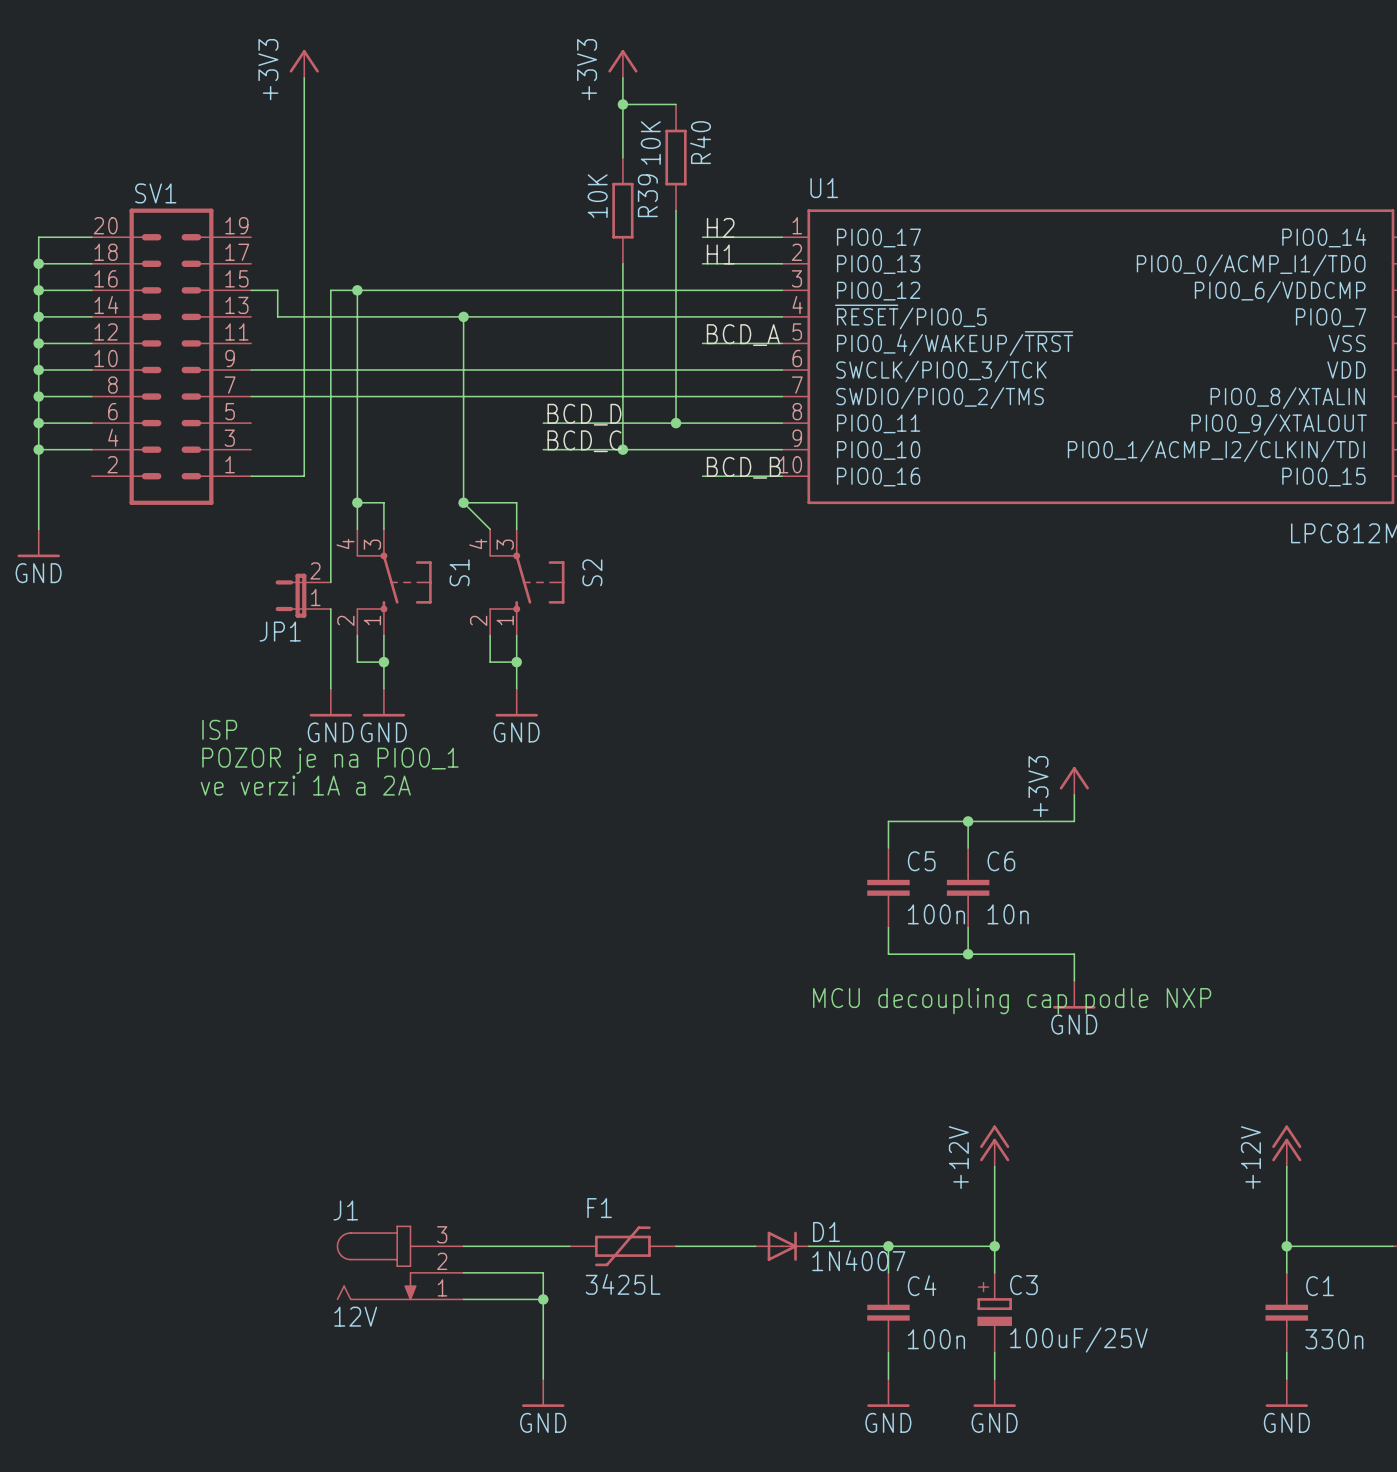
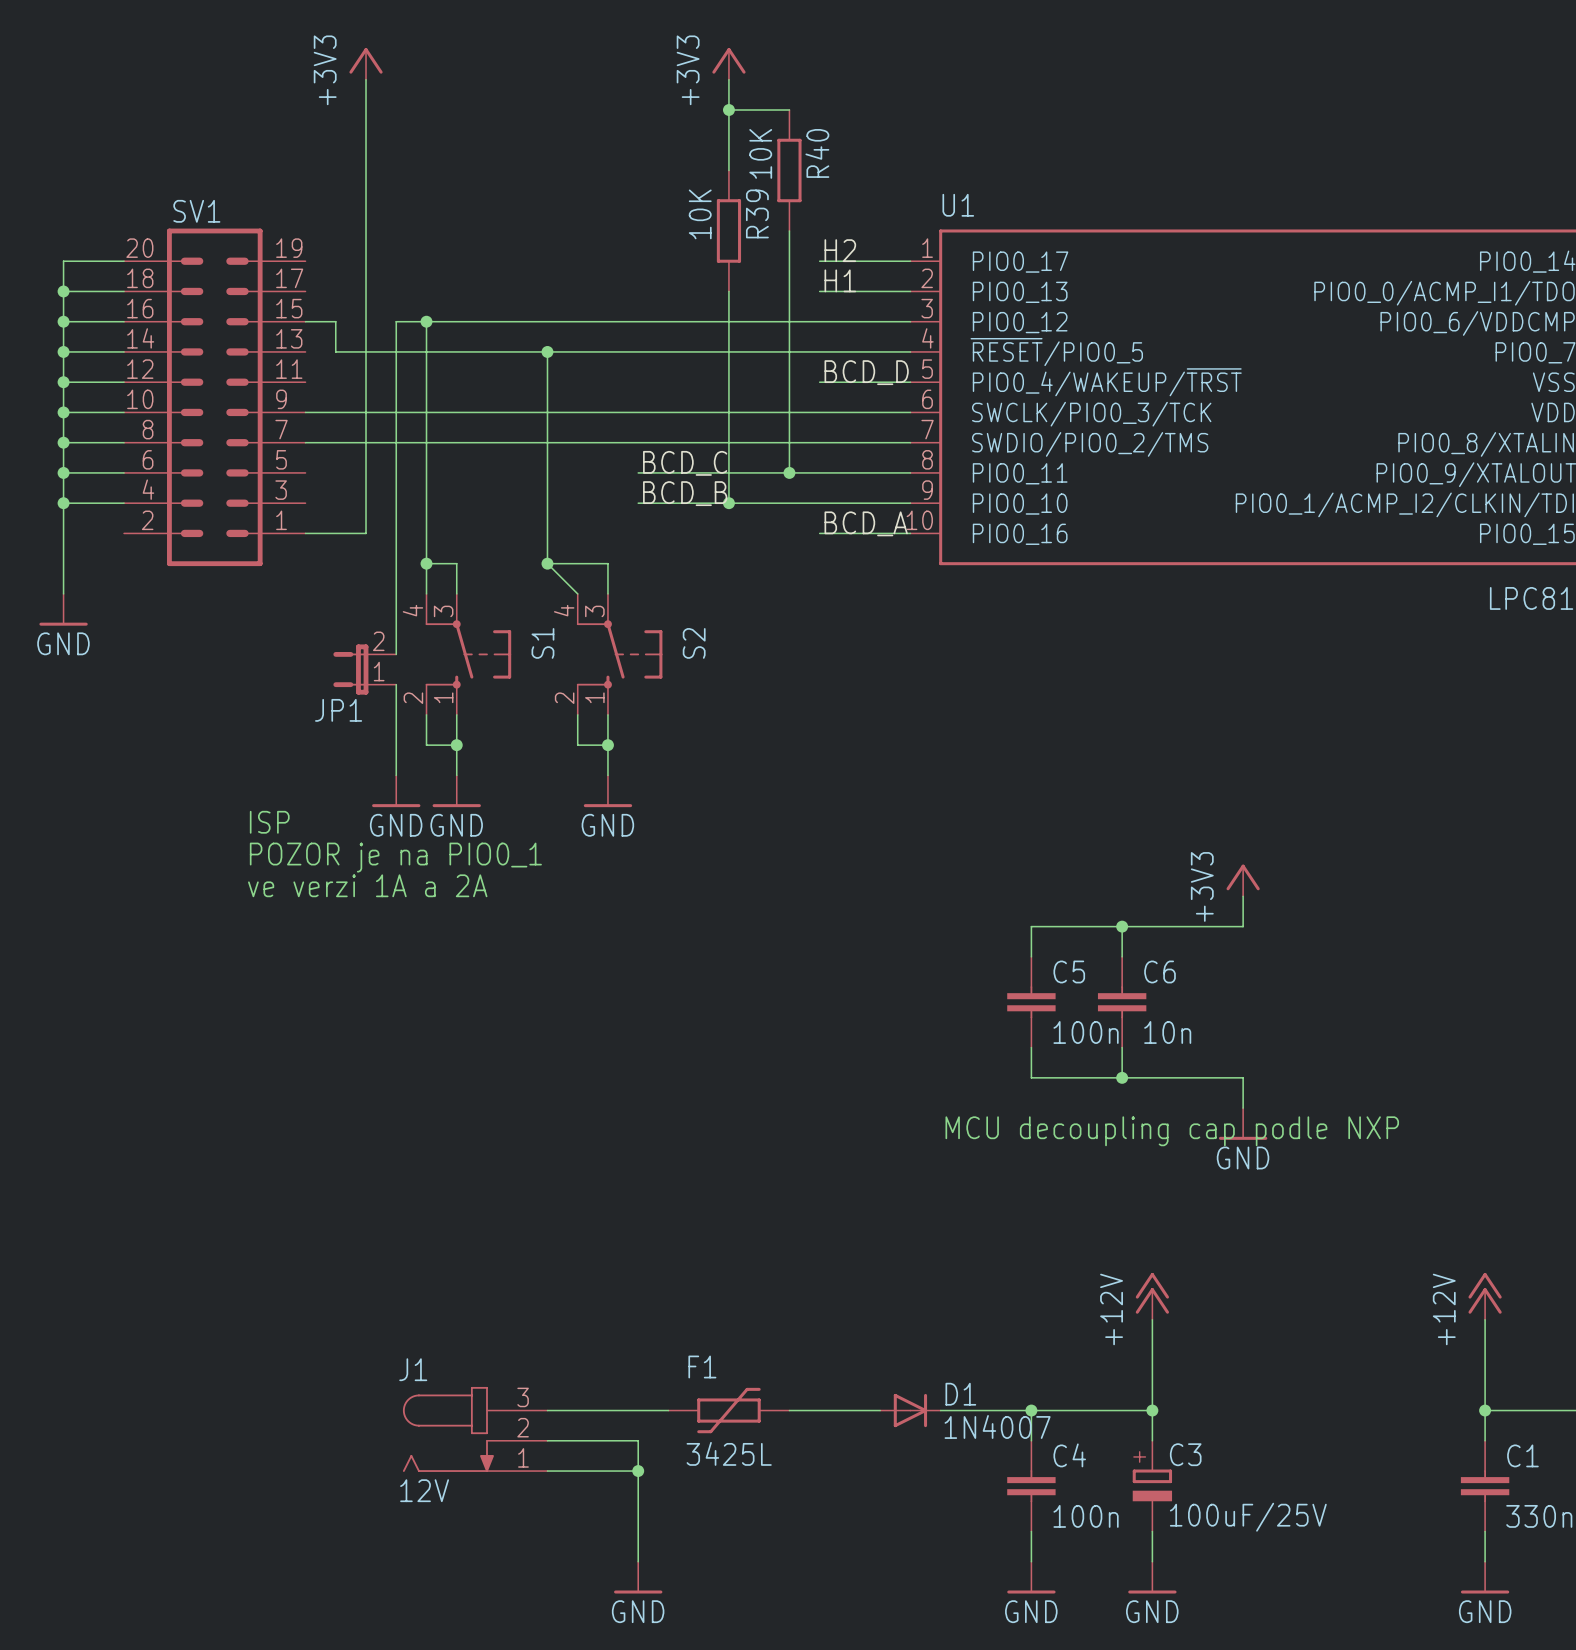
label: BCD_A (743, 335) -> BCD_D (866, 372)
label: BCD_D (584, 414) -> BCD_C (685, 463)
label: BCD_C (584, 441) -> BCD_B (685, 493)
label: BCD_B (743, 467) -> BCD_A (866, 523)

